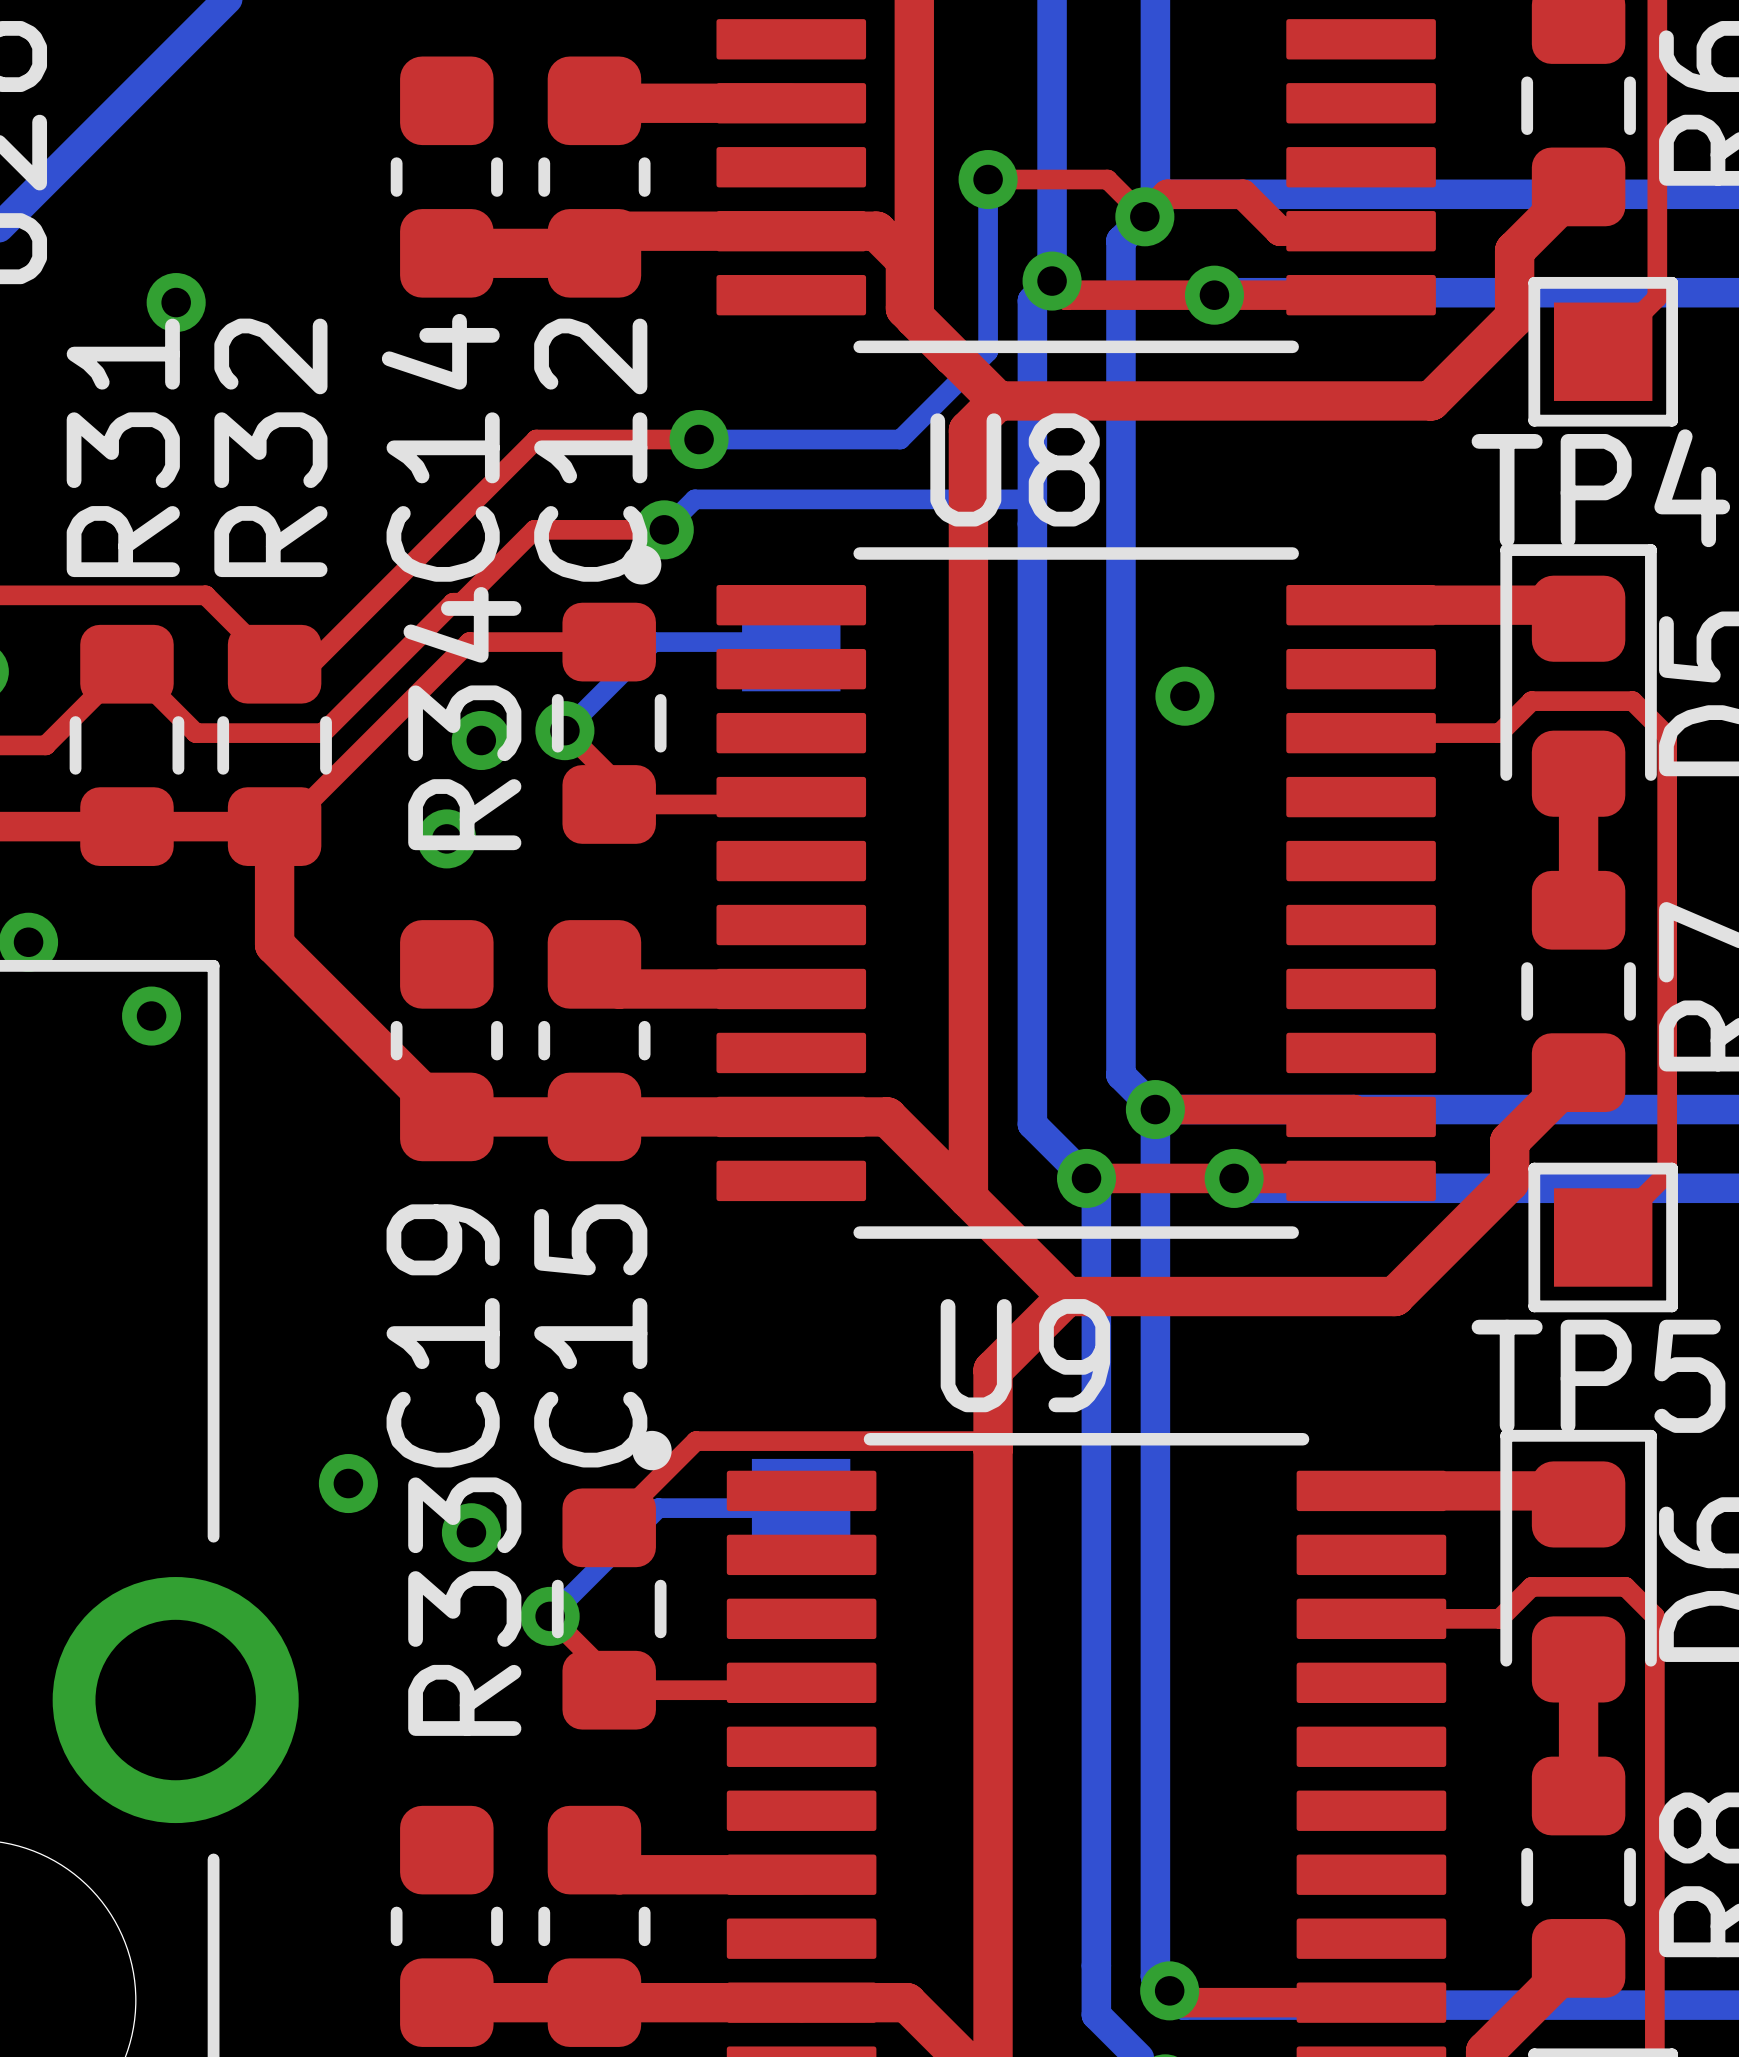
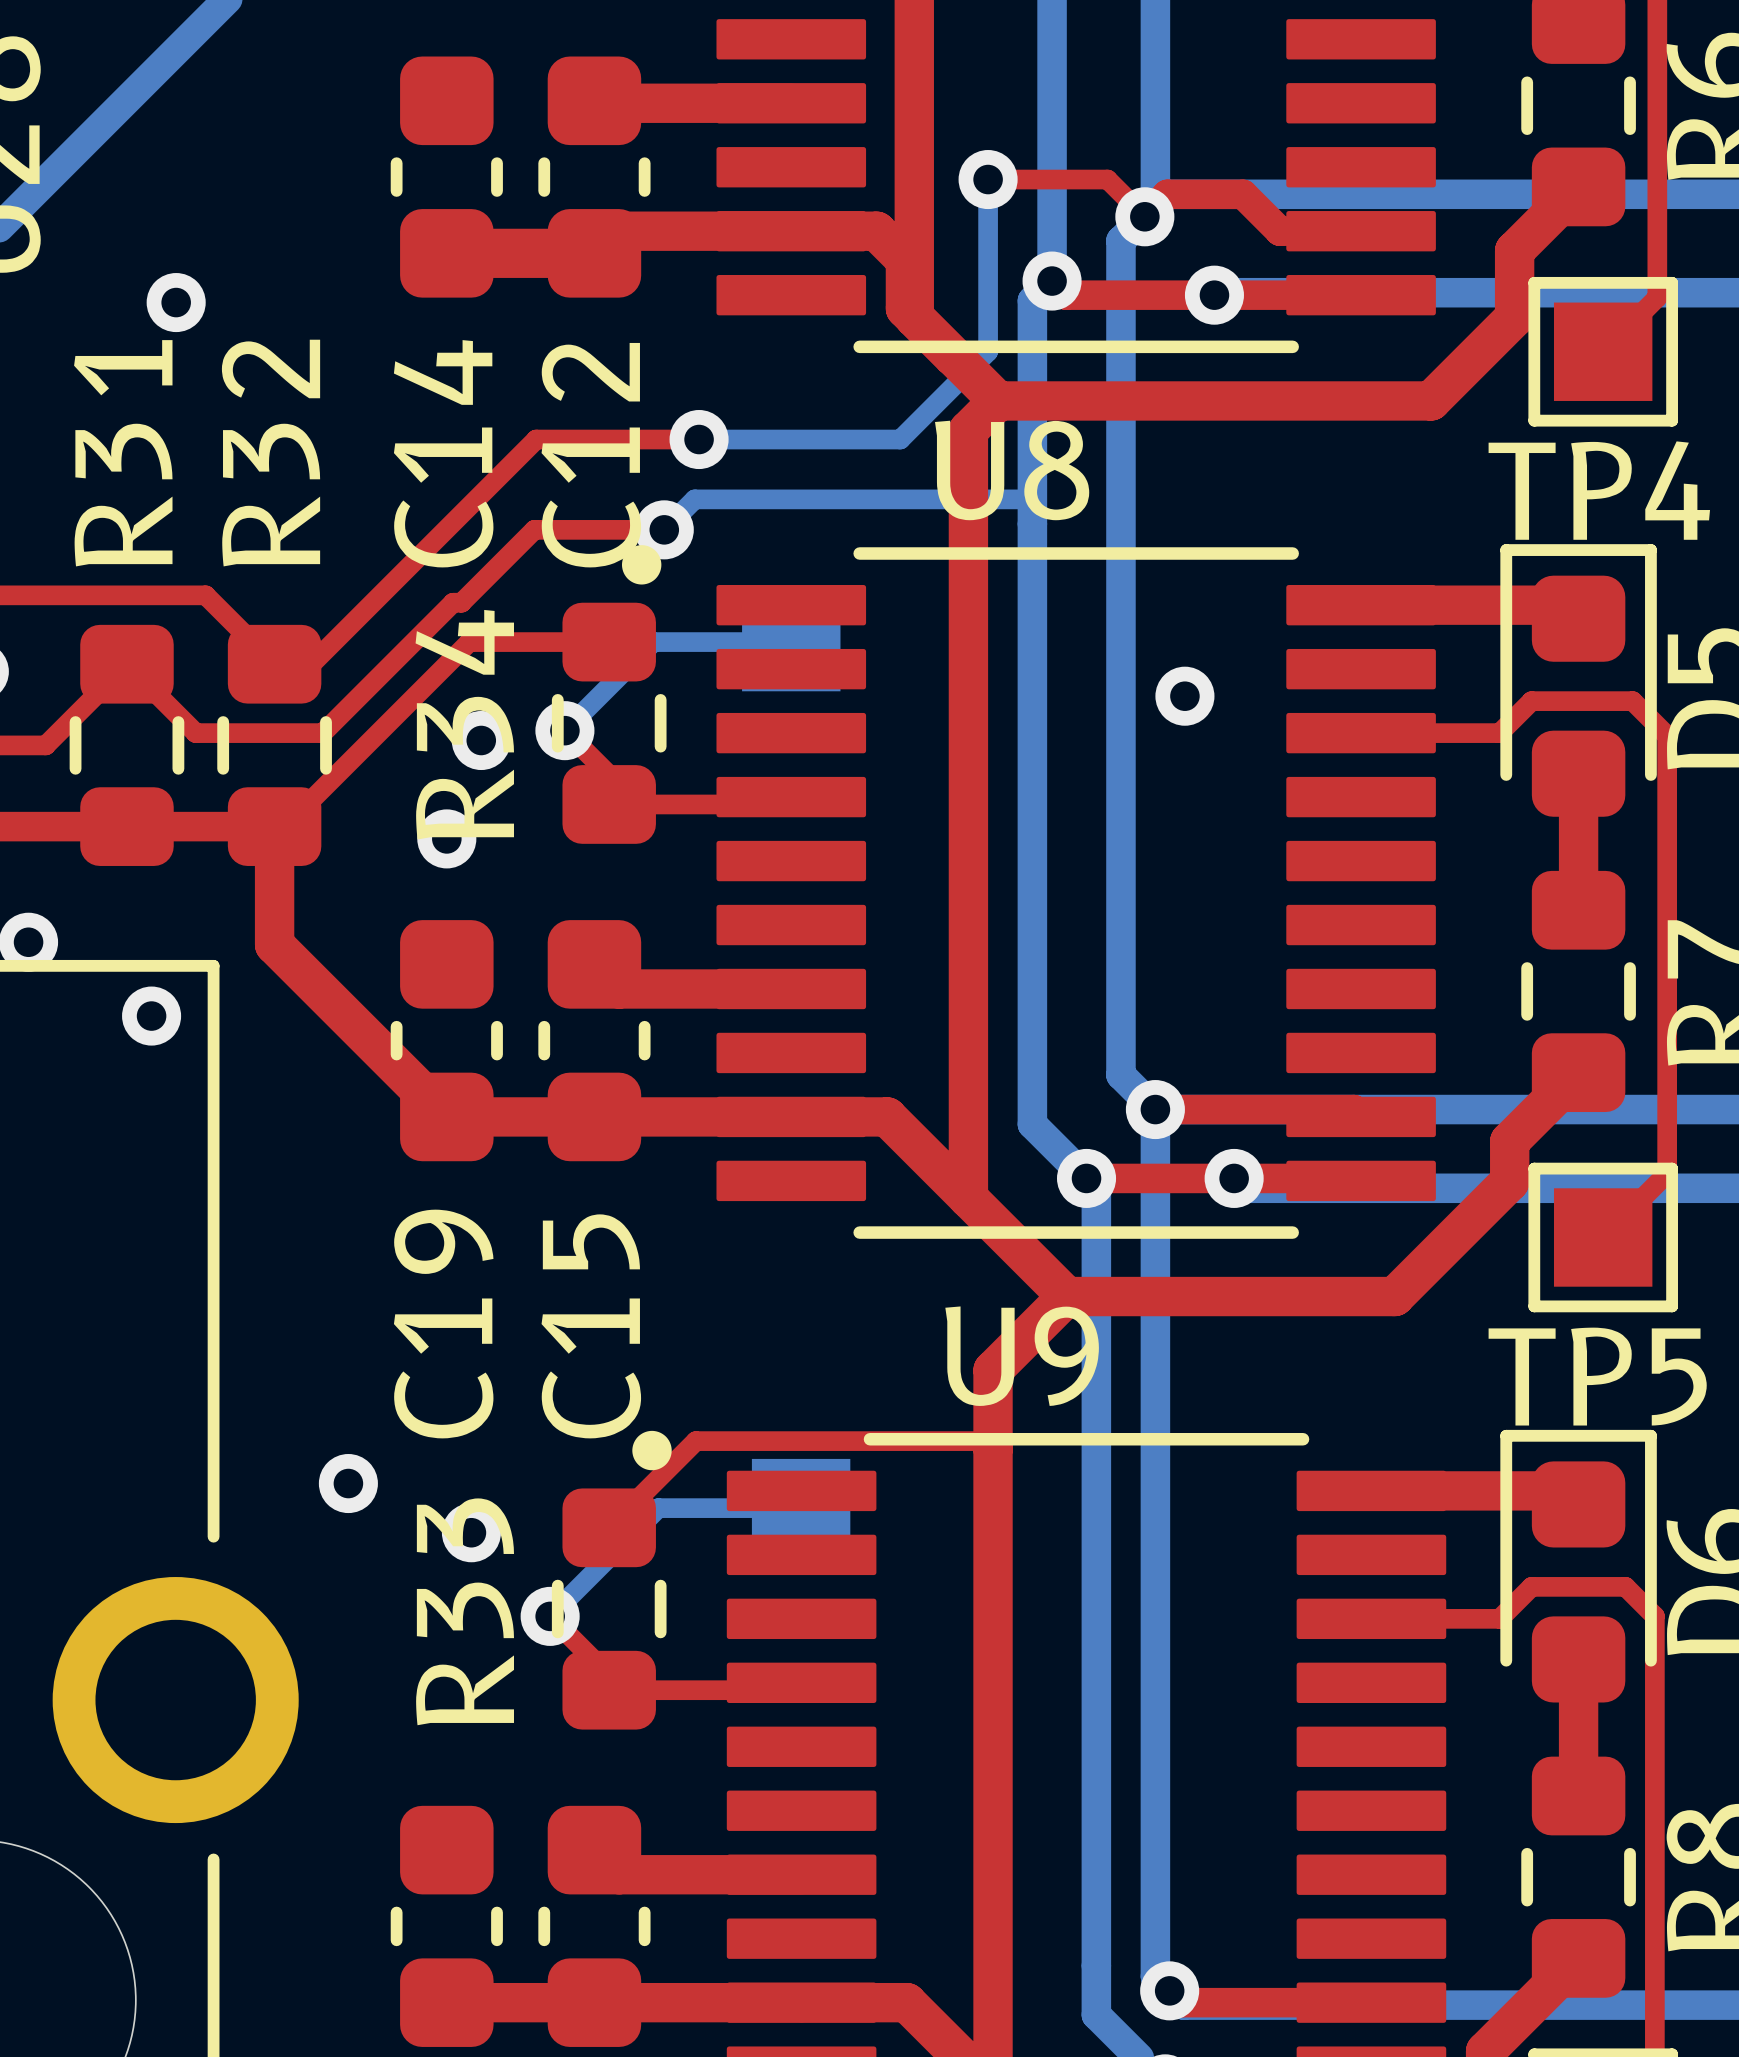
C19 name position: C19 (443, 1335) -> C19 (443, 1324)
C15 name position: C15 (590, 1335) -> C15 (591, 1326)

